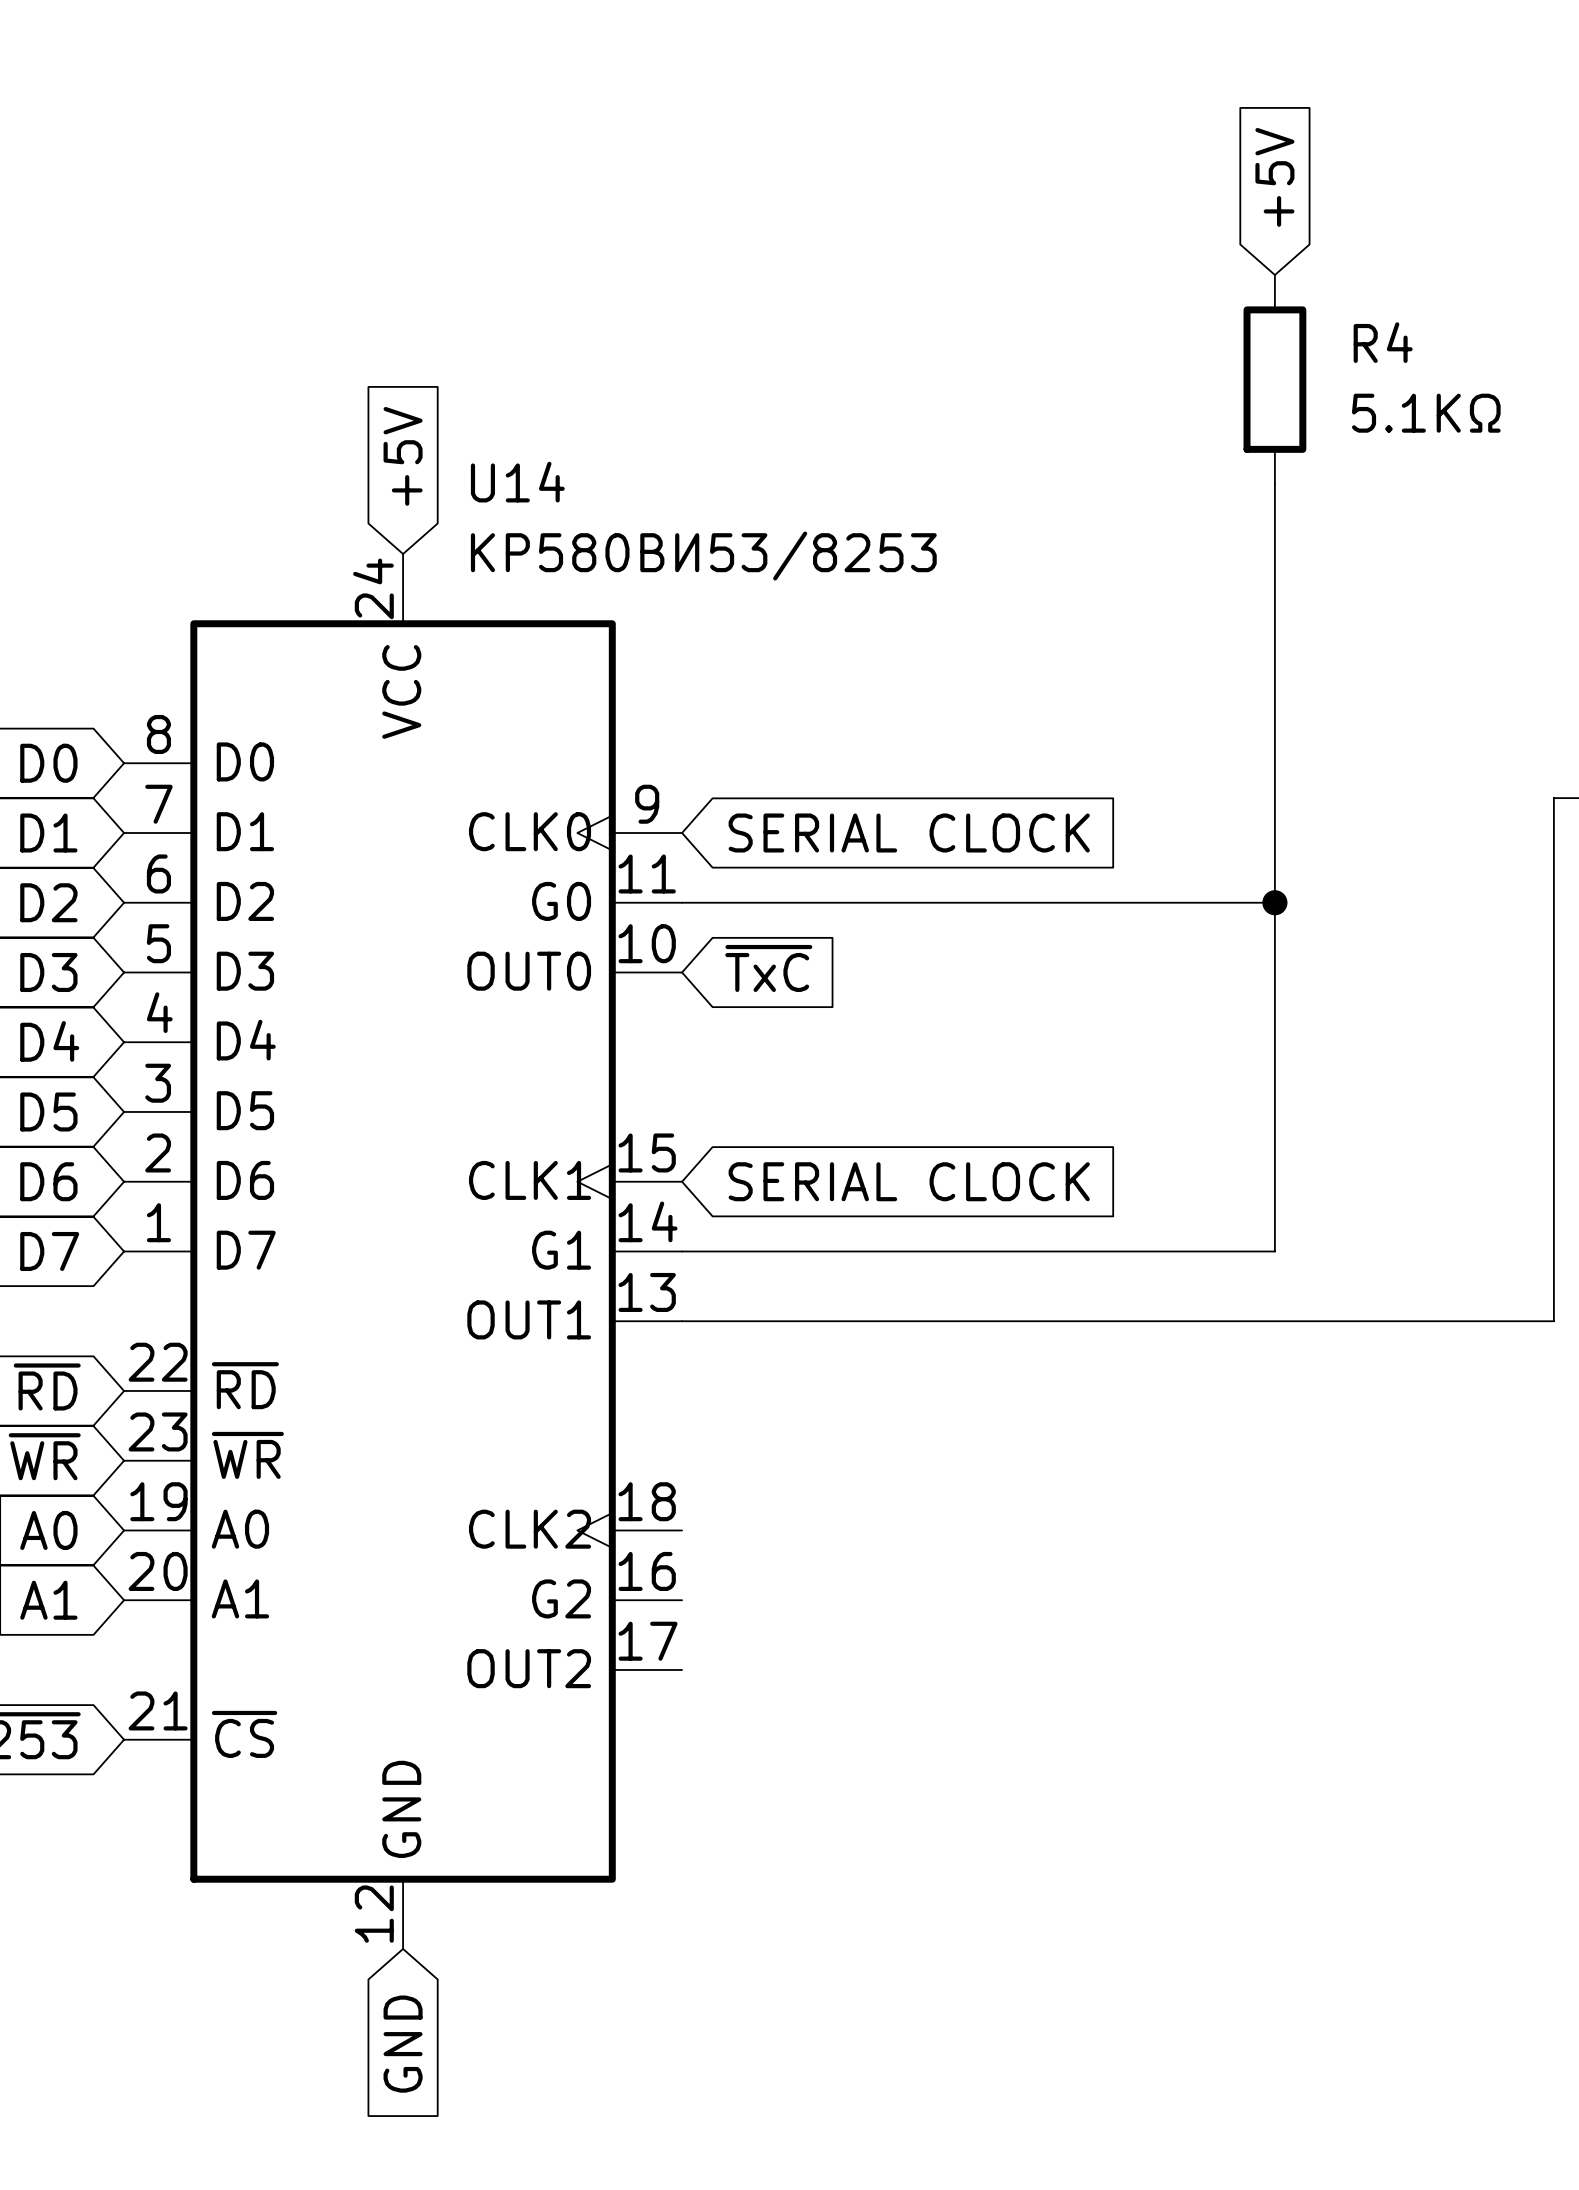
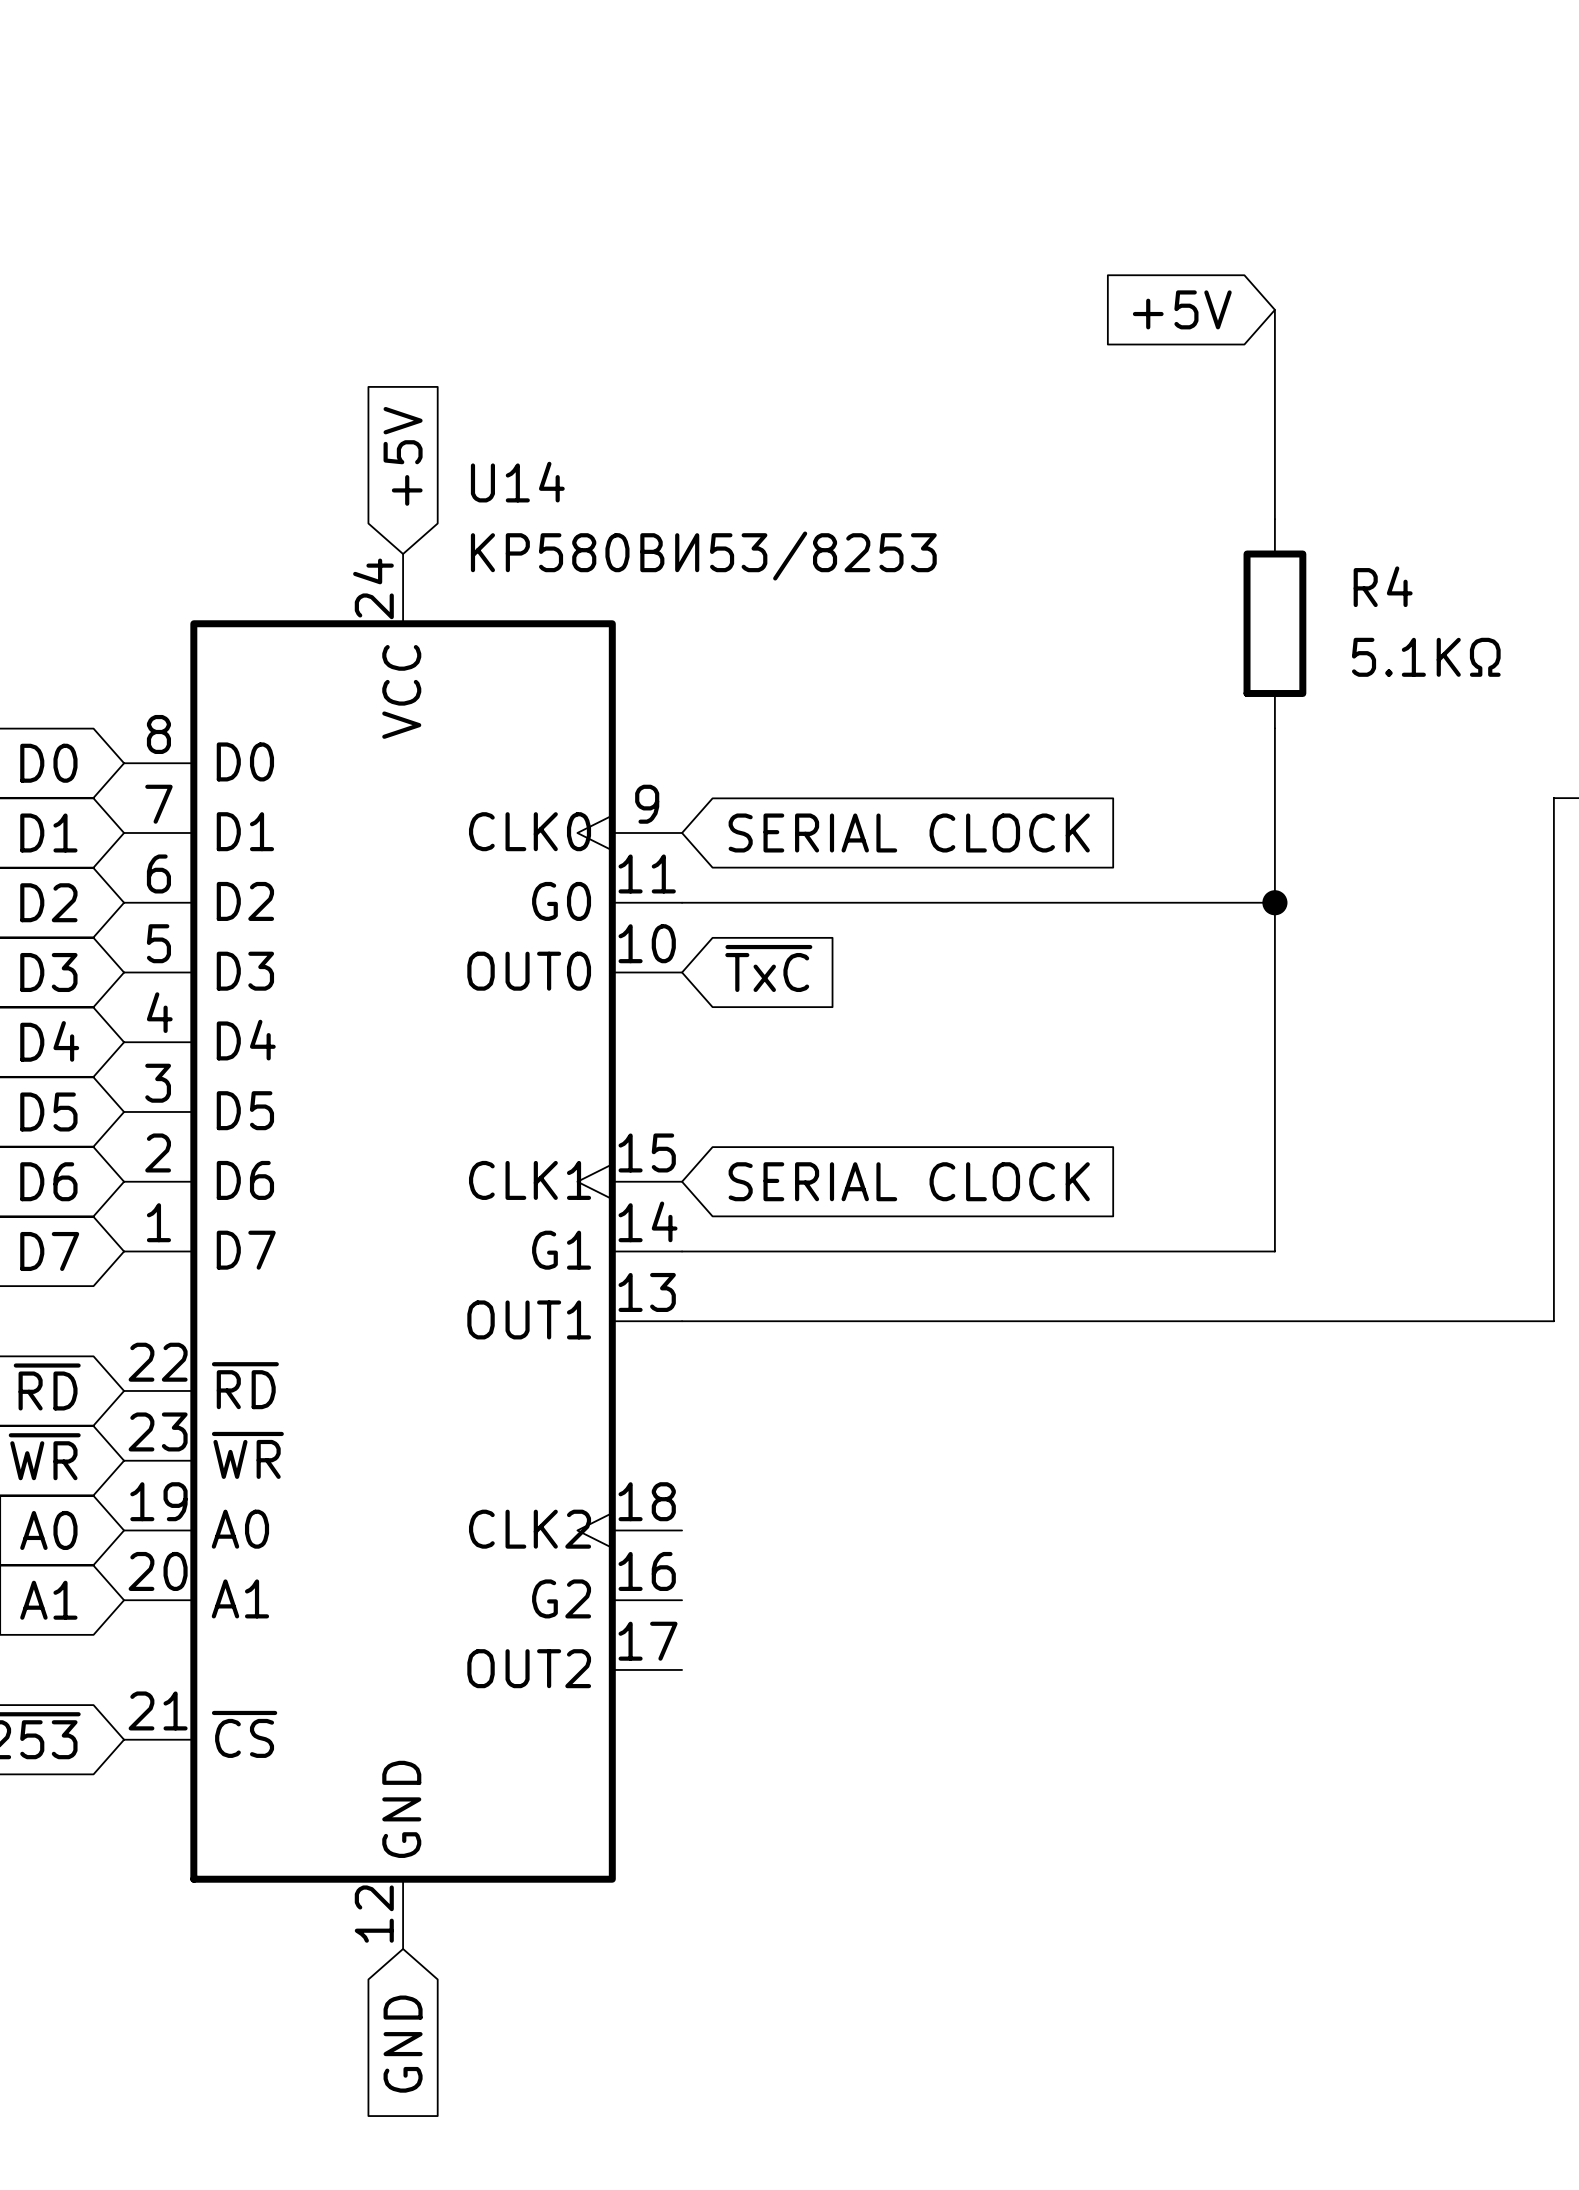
global label rotation: 0° (1274, 177) -> 90° counterclockwise (1182, 309)
wire: none -> (1274, 309) (1274, 484)
R4 position: (1274, 379) -> (1274, 623)
wire: (1274, 519) (1274, 728) -> none

